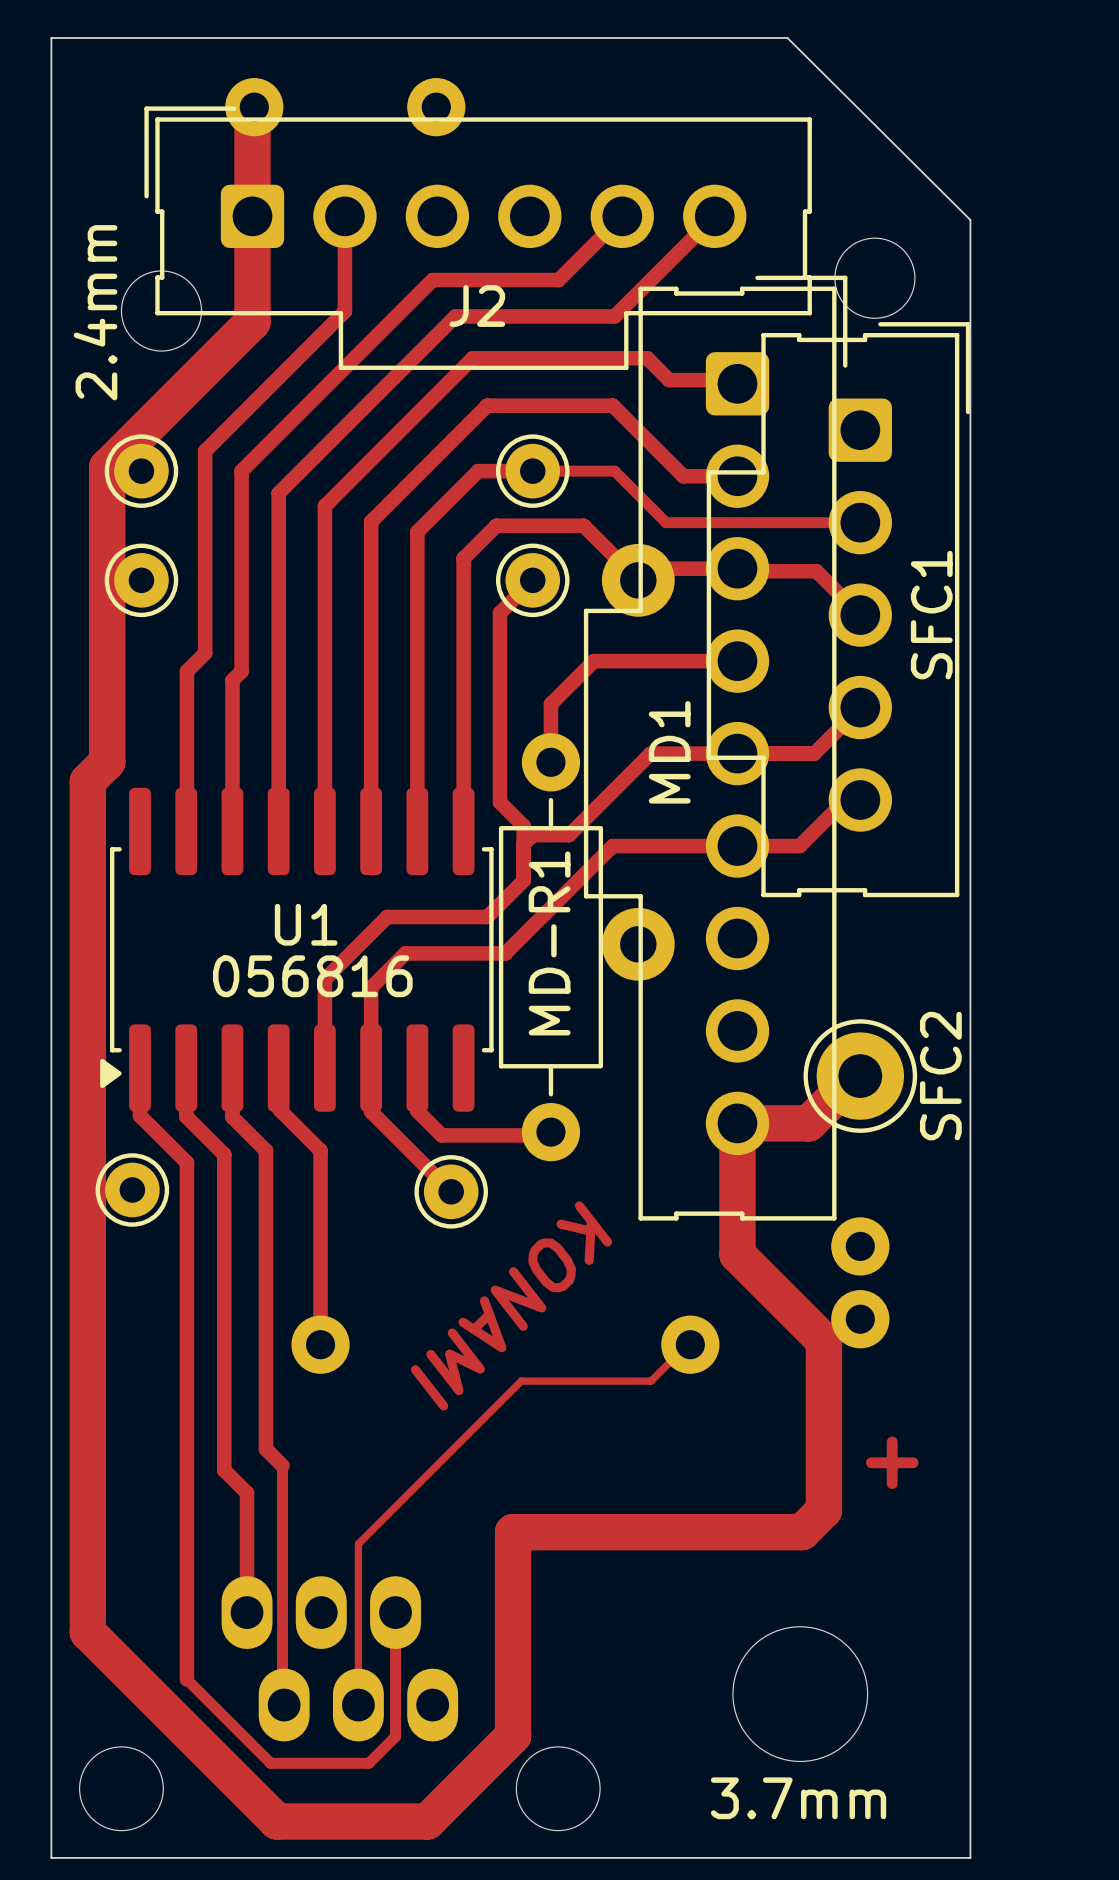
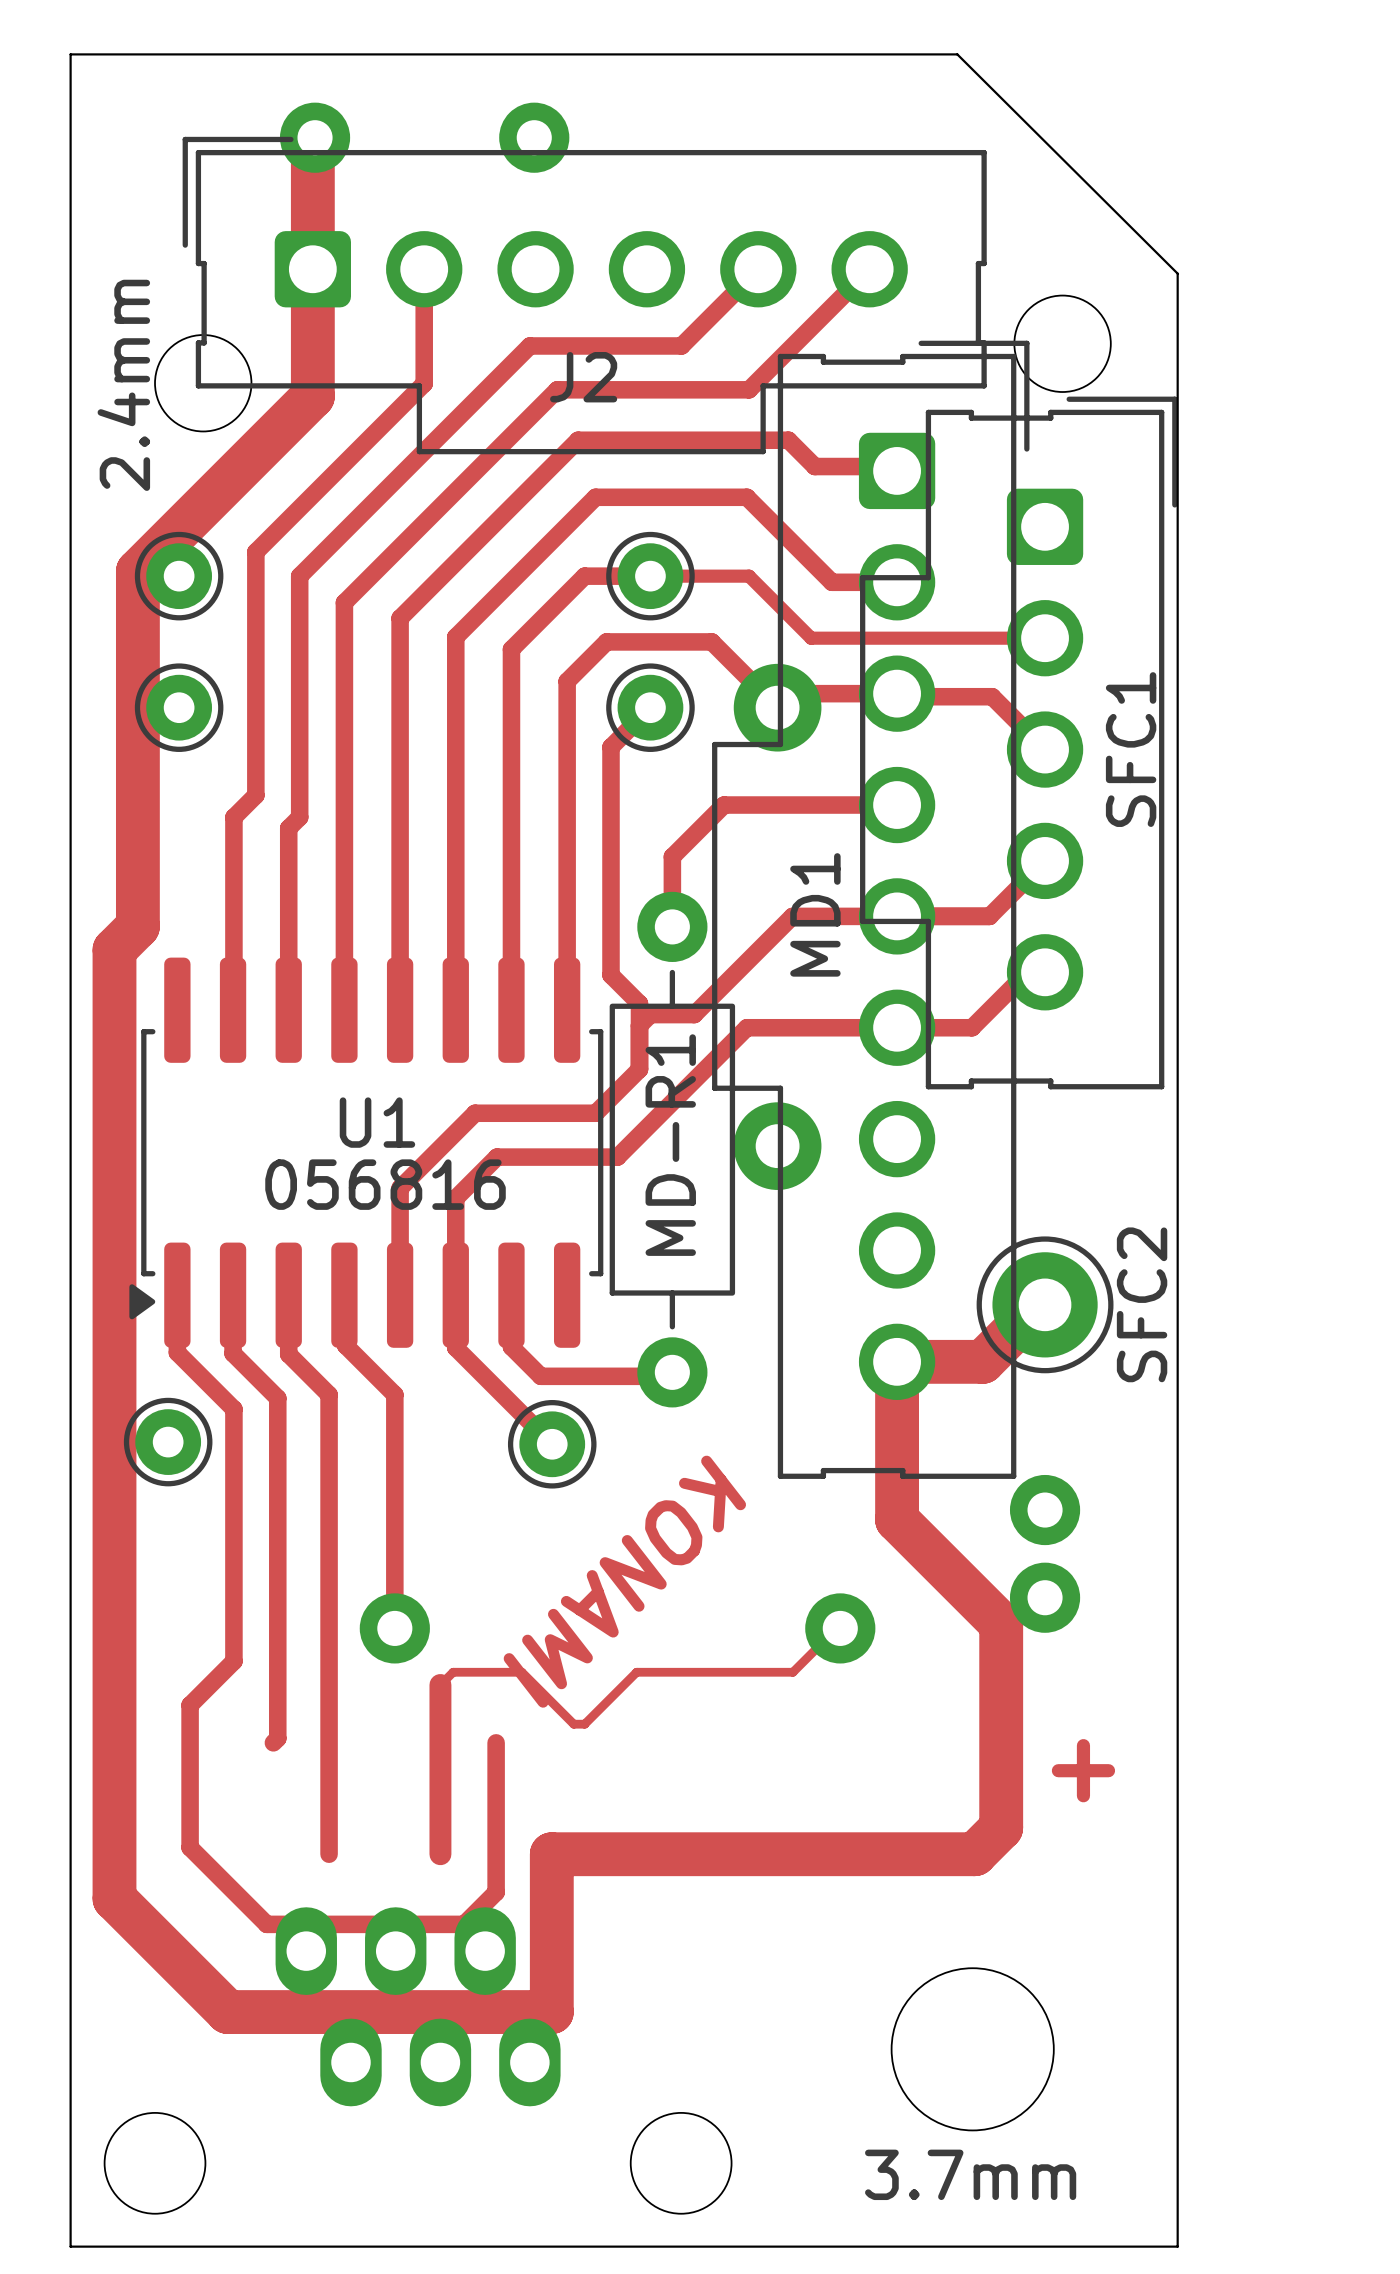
track: (223, 1153) (224, 1470) (247, 1493) (247, 1612) -> (277, 1398) (277, 1738) (273, 1742)
track: (186, 1371) (186, 1679) (270, 1763) (368, 1763) (395, 1736) (395, 1612) -> (233, 1661) (190, 1705) (190, 1847) (266, 1924) (464, 1924) (496, 1892) (496, 1742)
track: (478, 1424) (358, 1543) (358, 1705) -> (584, 1724) (573, 1724) (521, 1672) (453, 1672) (440, 1684) (440, 1854)
track: (265, 1449) (282, 1465) (282, 1703) (285, 1703) -> (329, 1754) (329, 1854)
track: (513, 1532) (513, 1735) (427, 1821) (277, 1821) (87, 1632) (87, 1569) -> (626, 1854) (551, 1854) (551, 2012) (227, 2012) (114, 1898)

